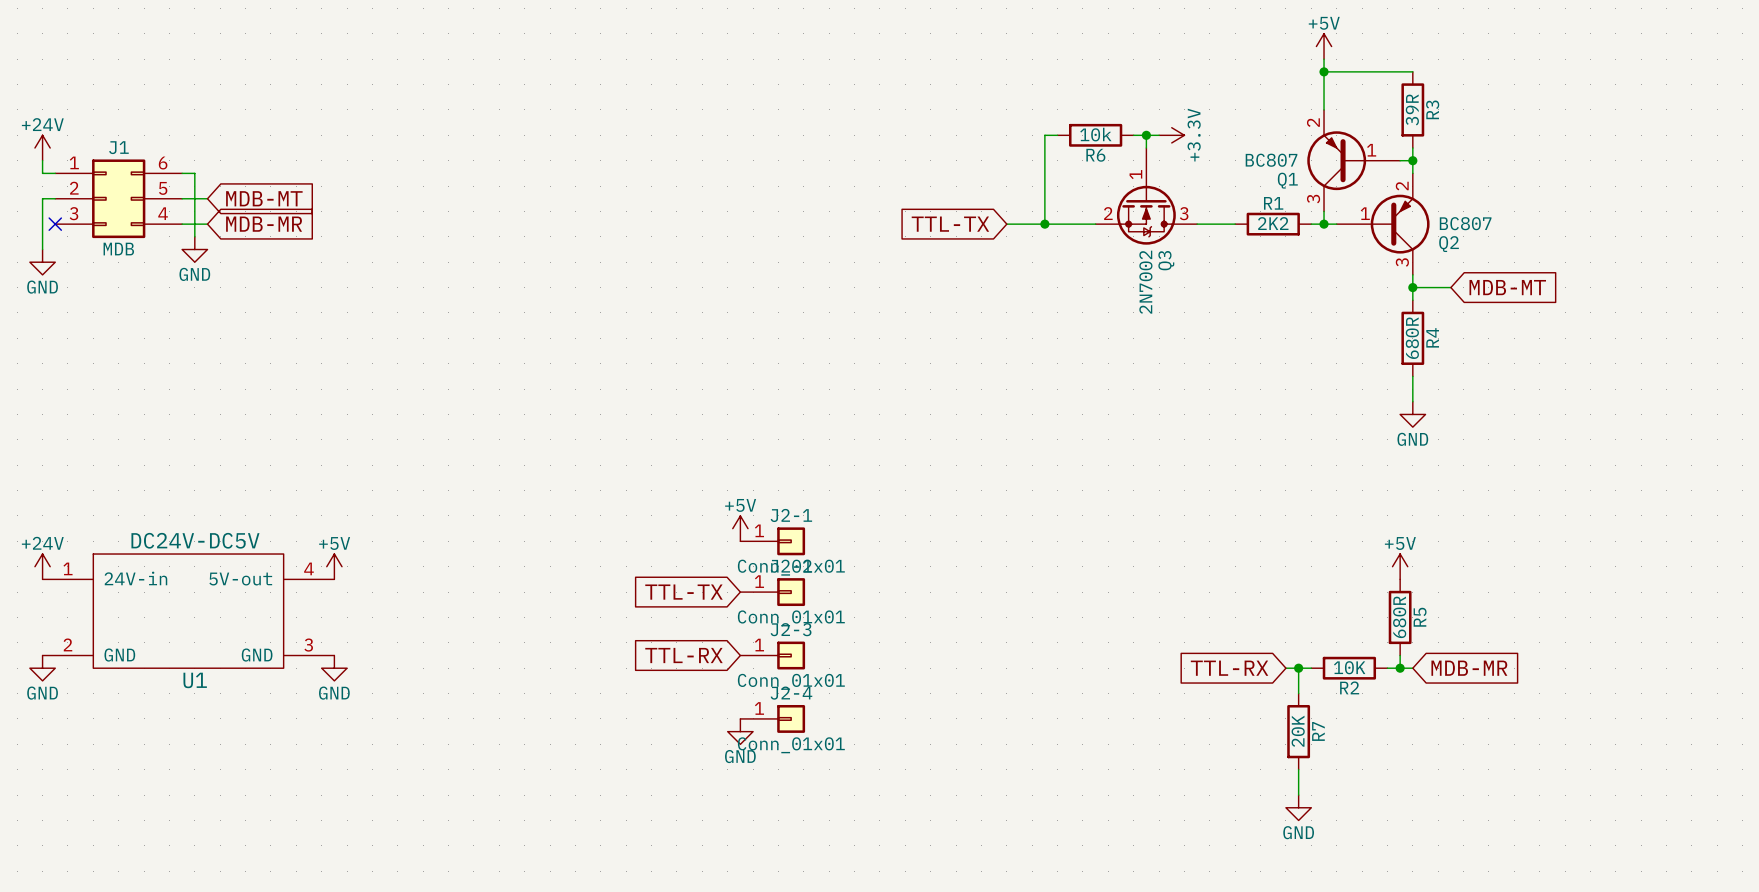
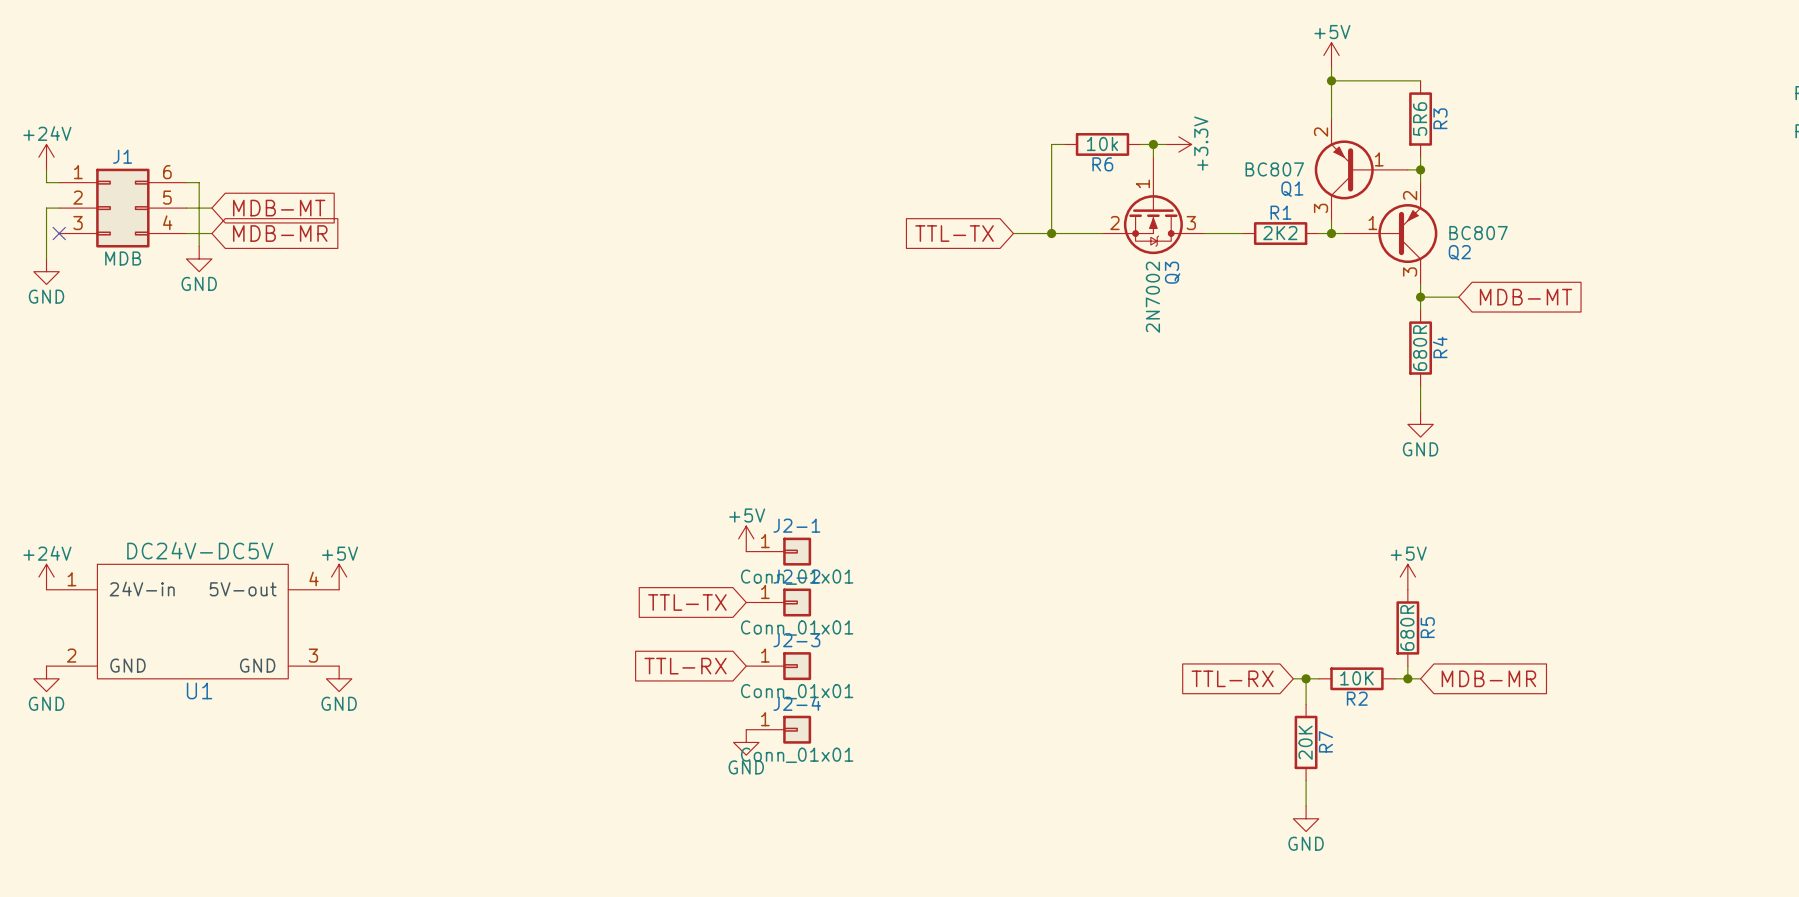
R3 value: 39R (1412, 109) -> 5R6 (1420, 119)

